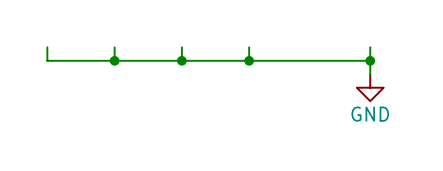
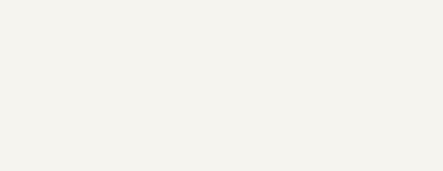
wire: (47, 47) (47, 60) (370, 60) -> none
wire: (114, 47) (114, 60) -> none
wire: (181, 47) (181, 60) -> none
wire: (249, 47) (249, 60) -> none
wire: (370, 47) (370, 74) -> none
junction: (114, 60) -> none
junction: (181, 60) -> none
junction: (249, 60) -> none
junction: (370, 60) -> none
power symbol: GND (370, 87) -> none

